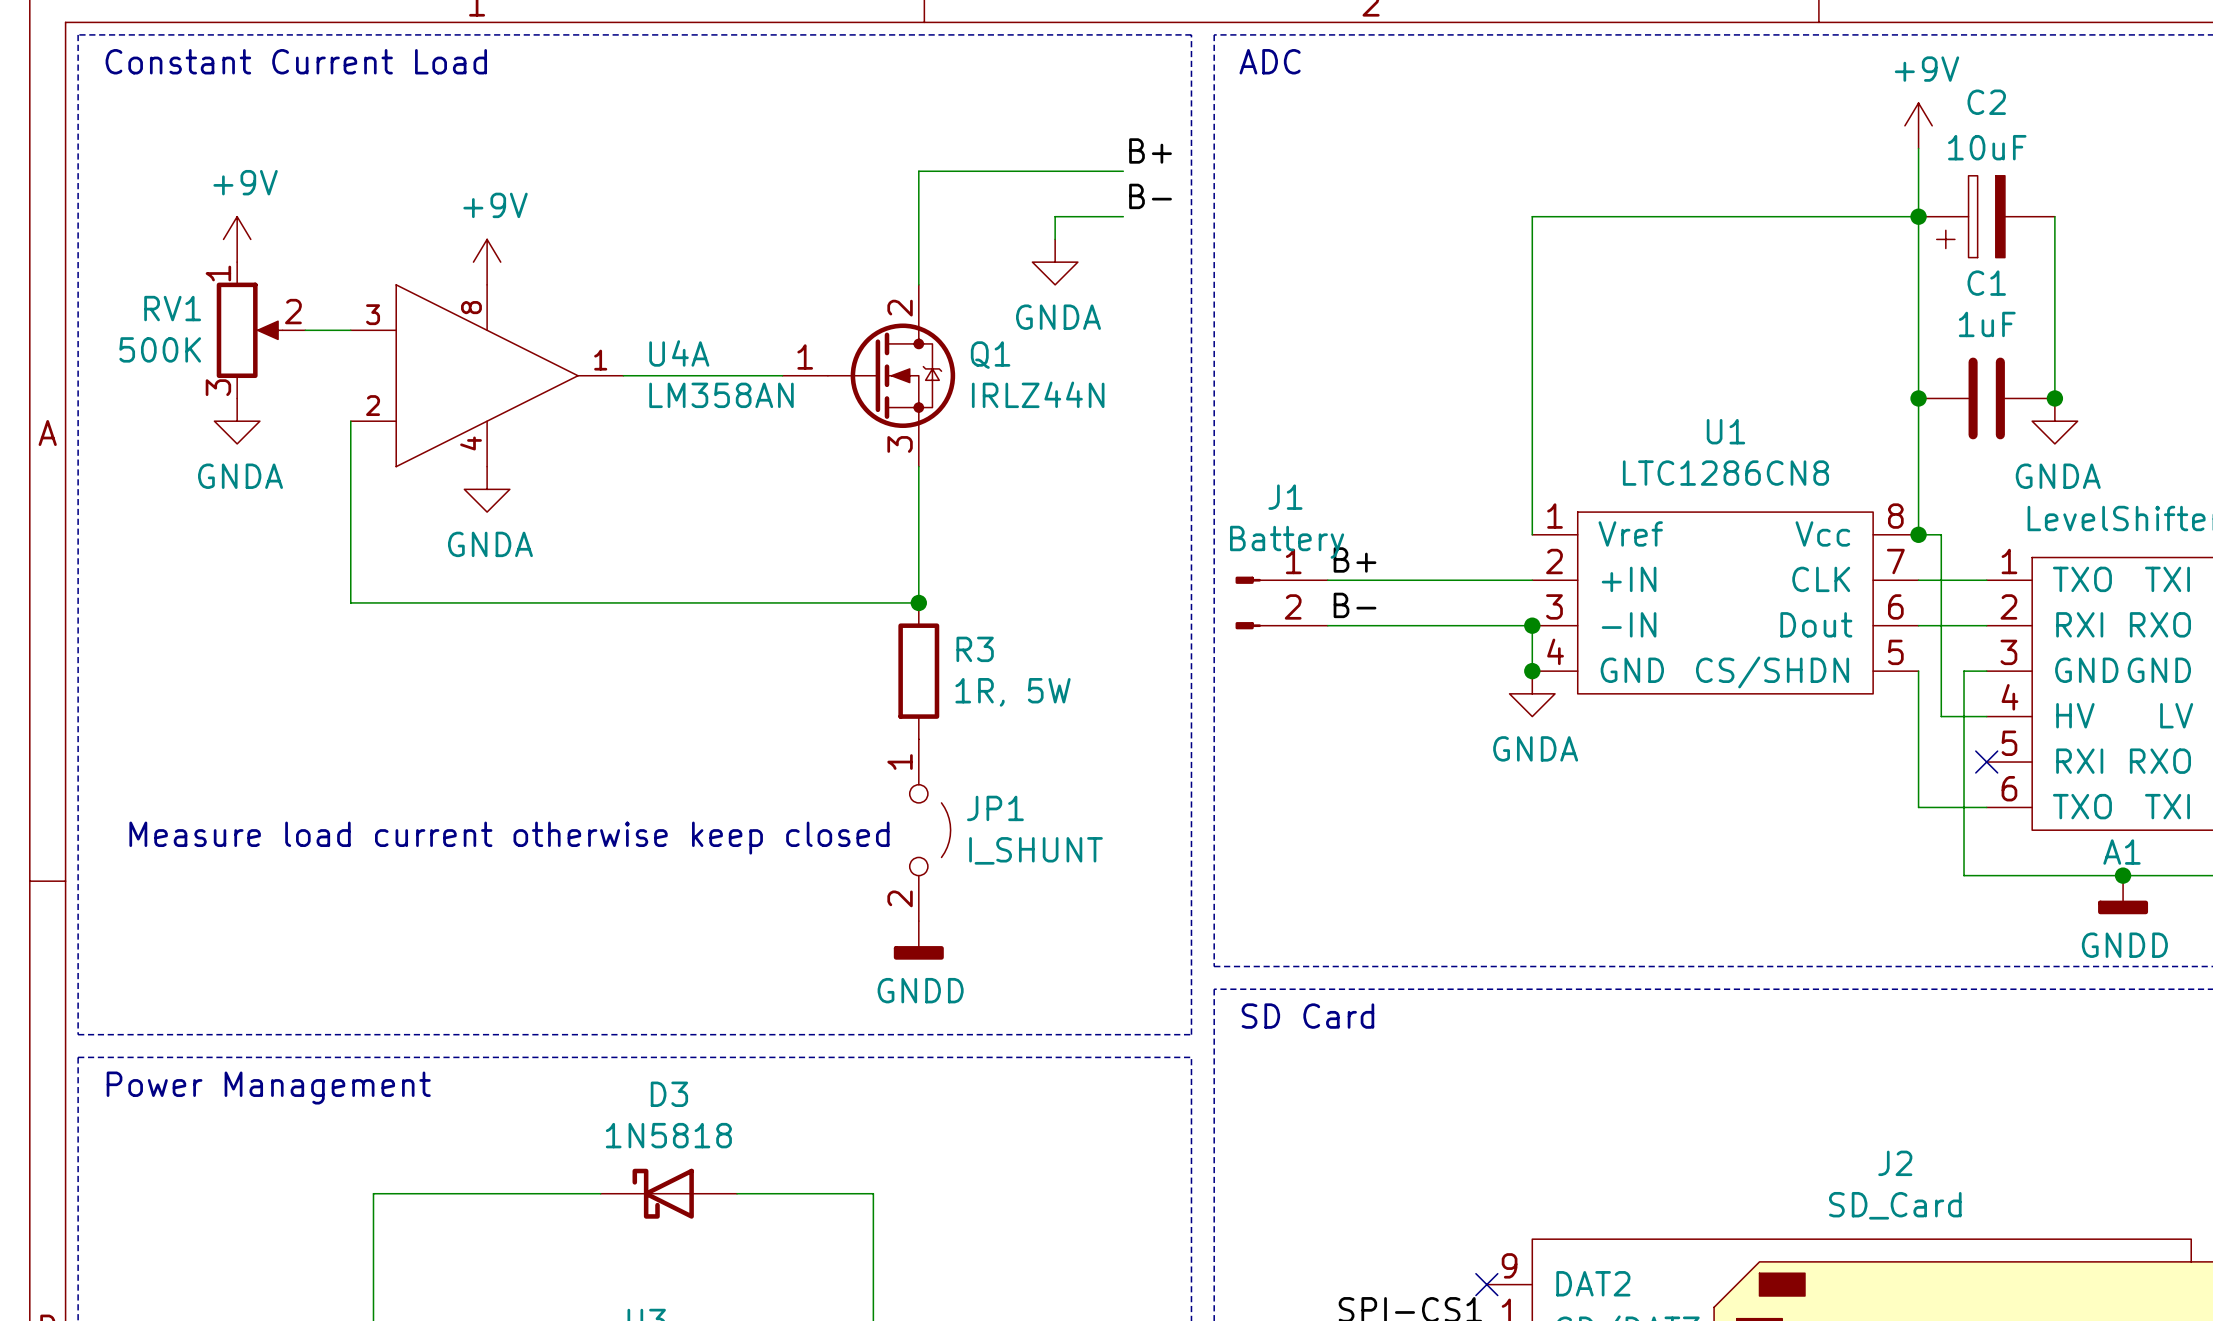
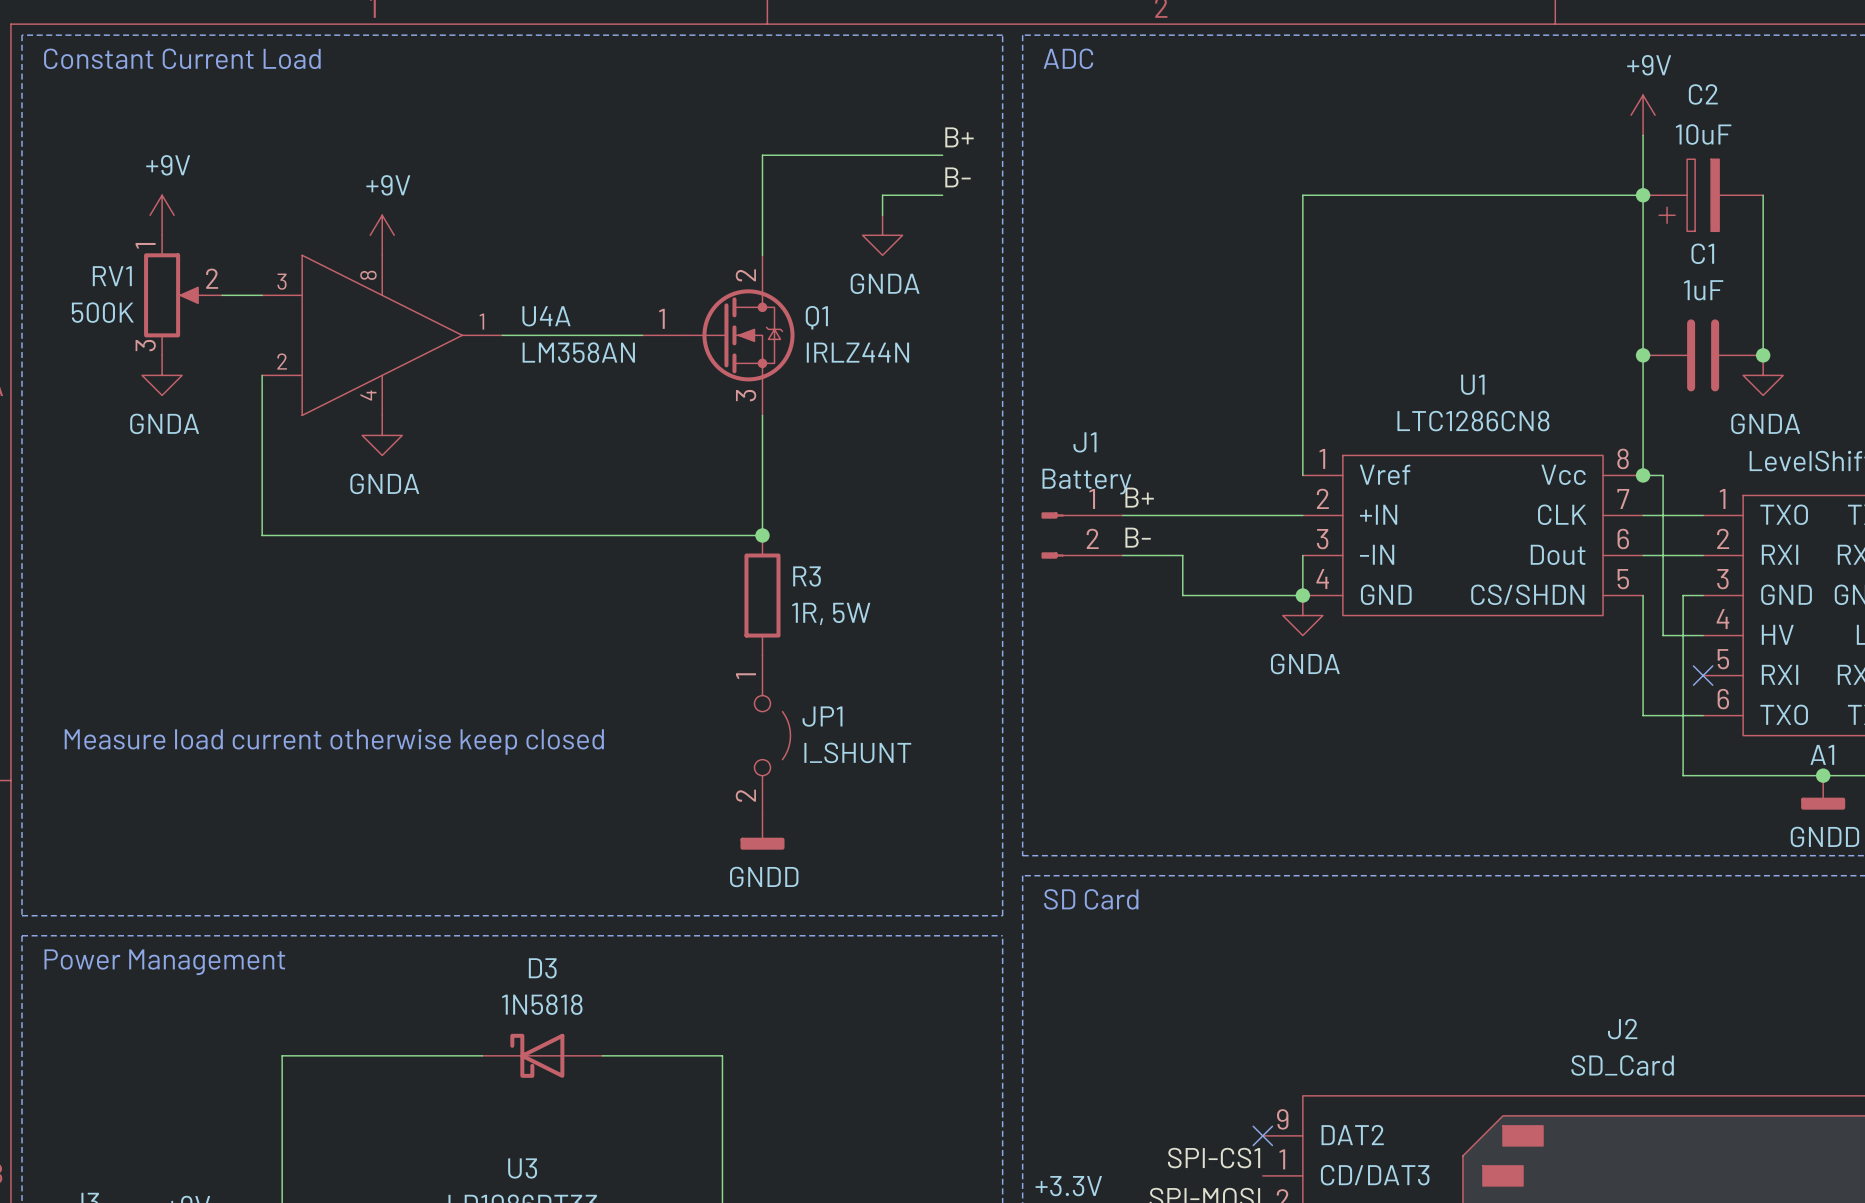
wire: (1395, 625) (1532, 625) -> (1182, 555) (1182, 595) (1302, 595)
junction: (1532, 625) -> none

